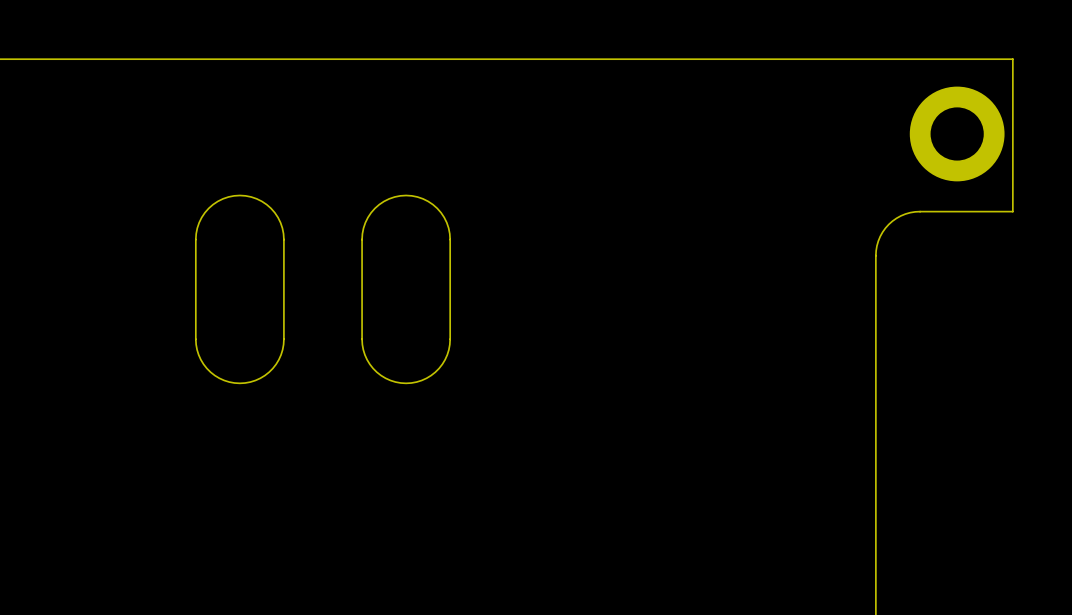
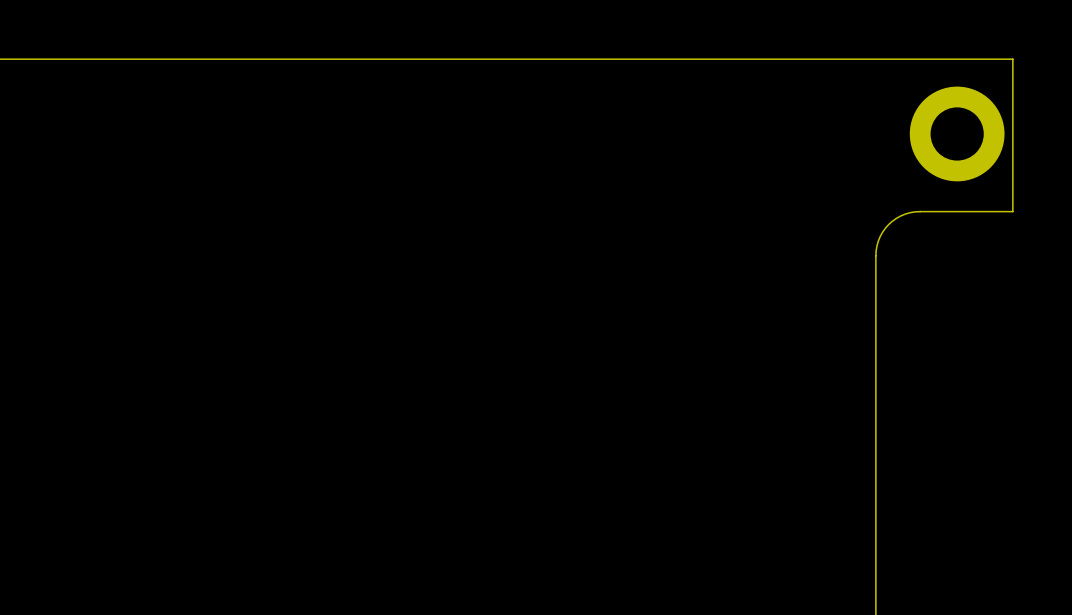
board edge: (283, 239) (283, 339) (281, 354) (269, 372) (255, 380) (239, 383) (224, 380) (210, 372) (203, 364) (196, 344) (195, 239) (199, 222) (208, 208) (223, 198) (239, 195) (251, 196) (266, 204) (274, 212) (282, 228) (283, 239) -> none
board edge: (450, 239) (450, 339) (447, 354) (439, 368) (421, 380) (406, 383) (390, 380) (373, 368) (367, 359) (362, 344) (362, 239) (365, 222) (374, 208) (389, 198) (406, 195) (417, 196) (428, 201) (441, 212) (446, 222) (450, 239) -> none

